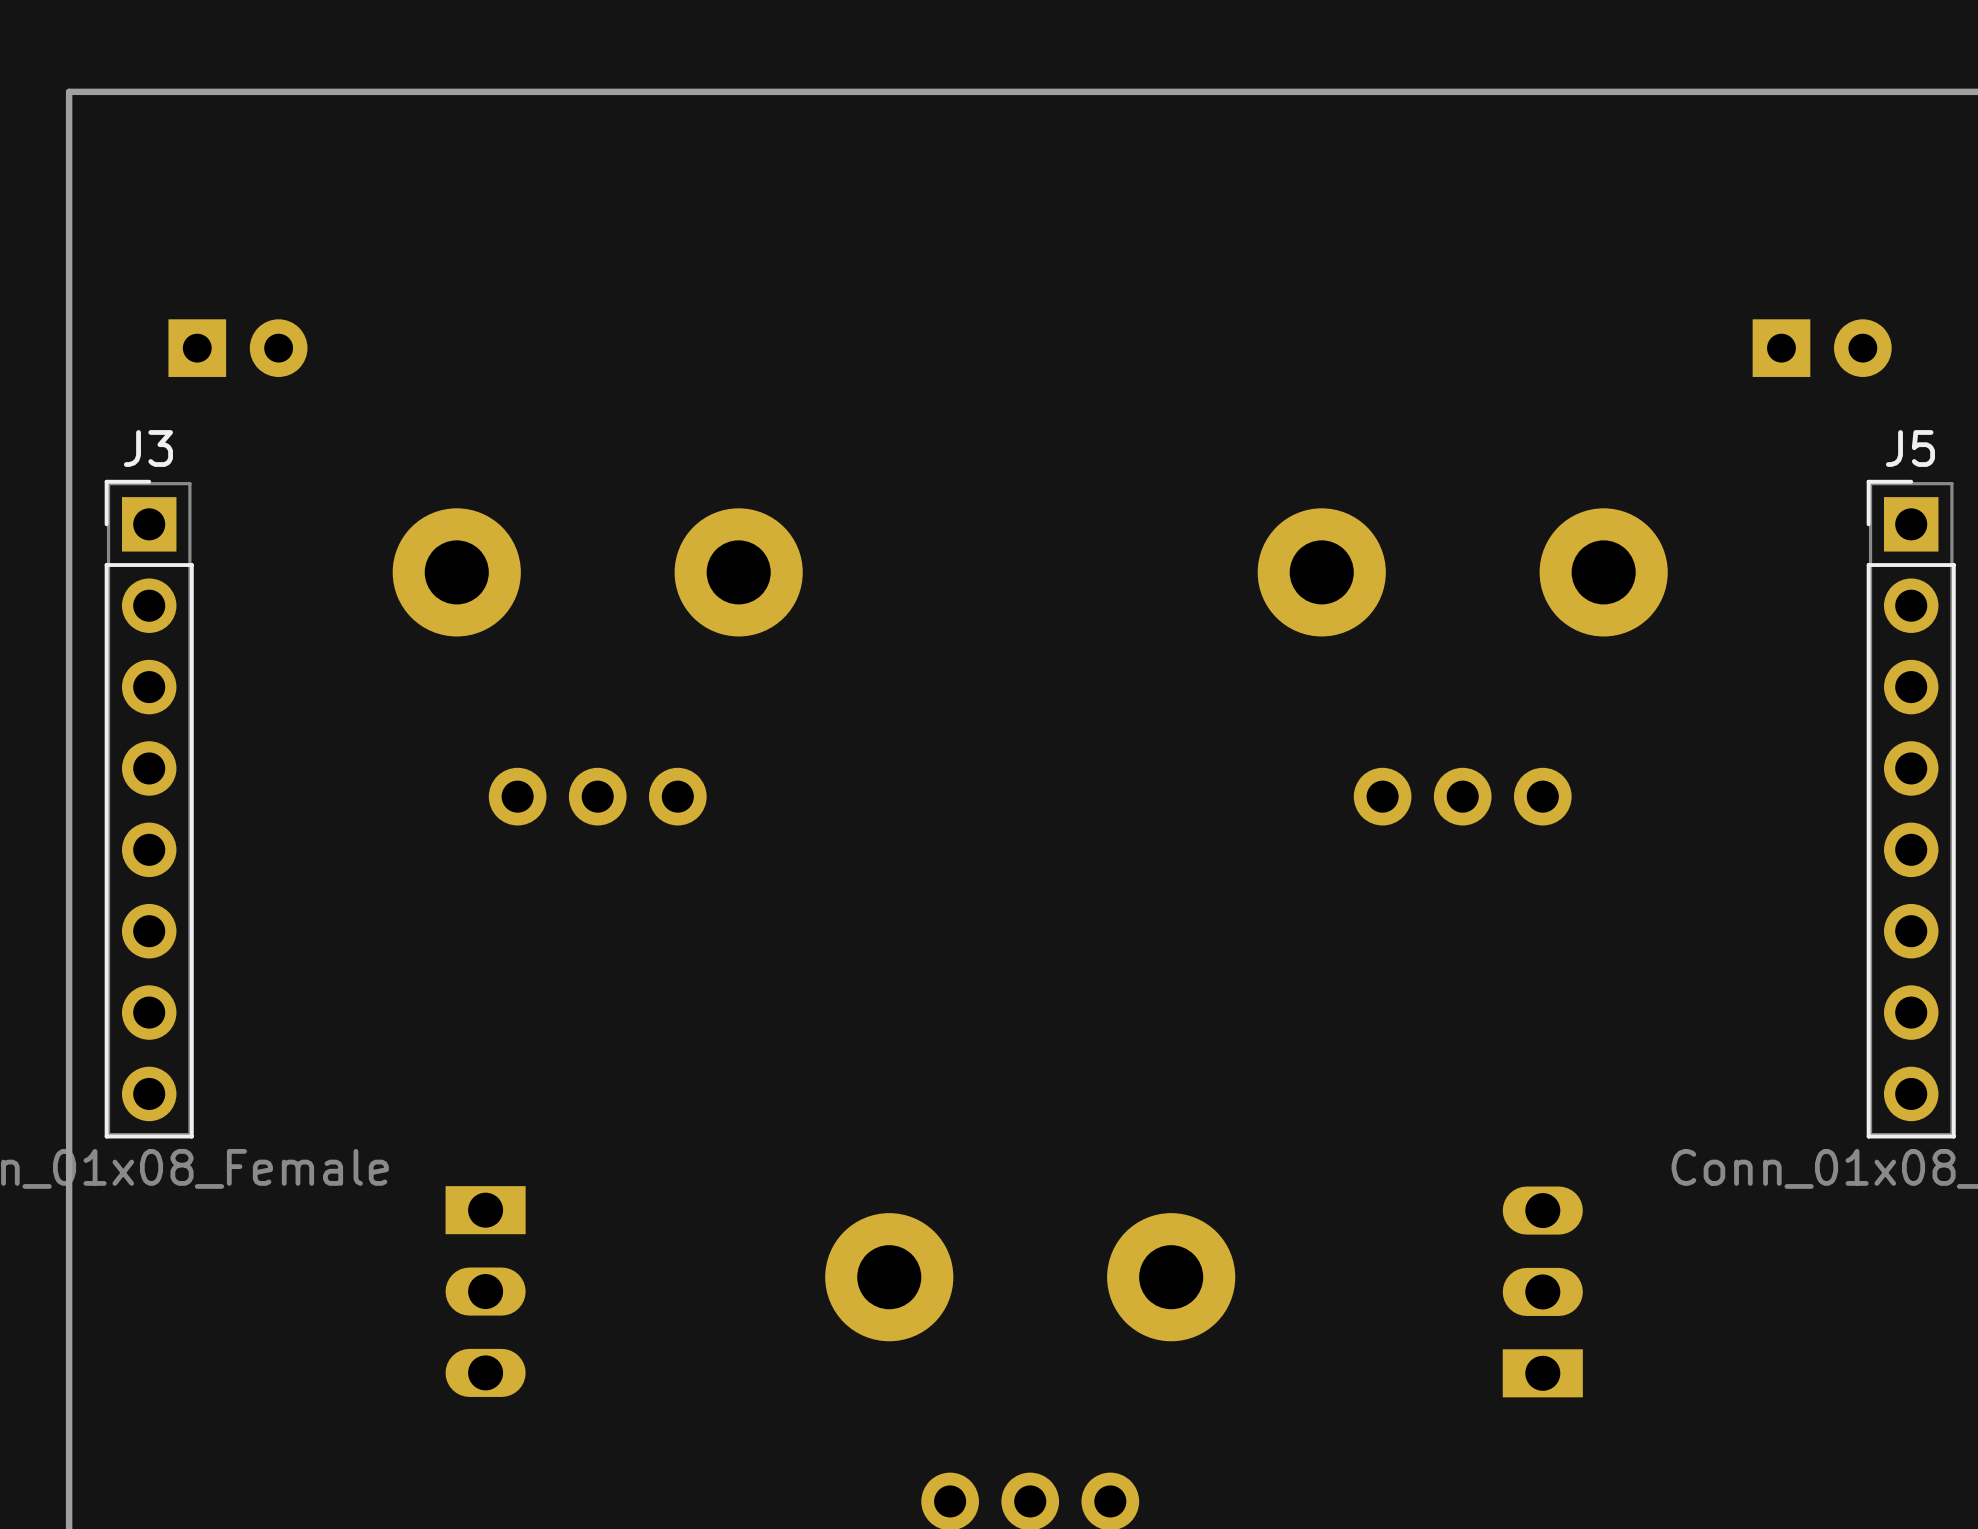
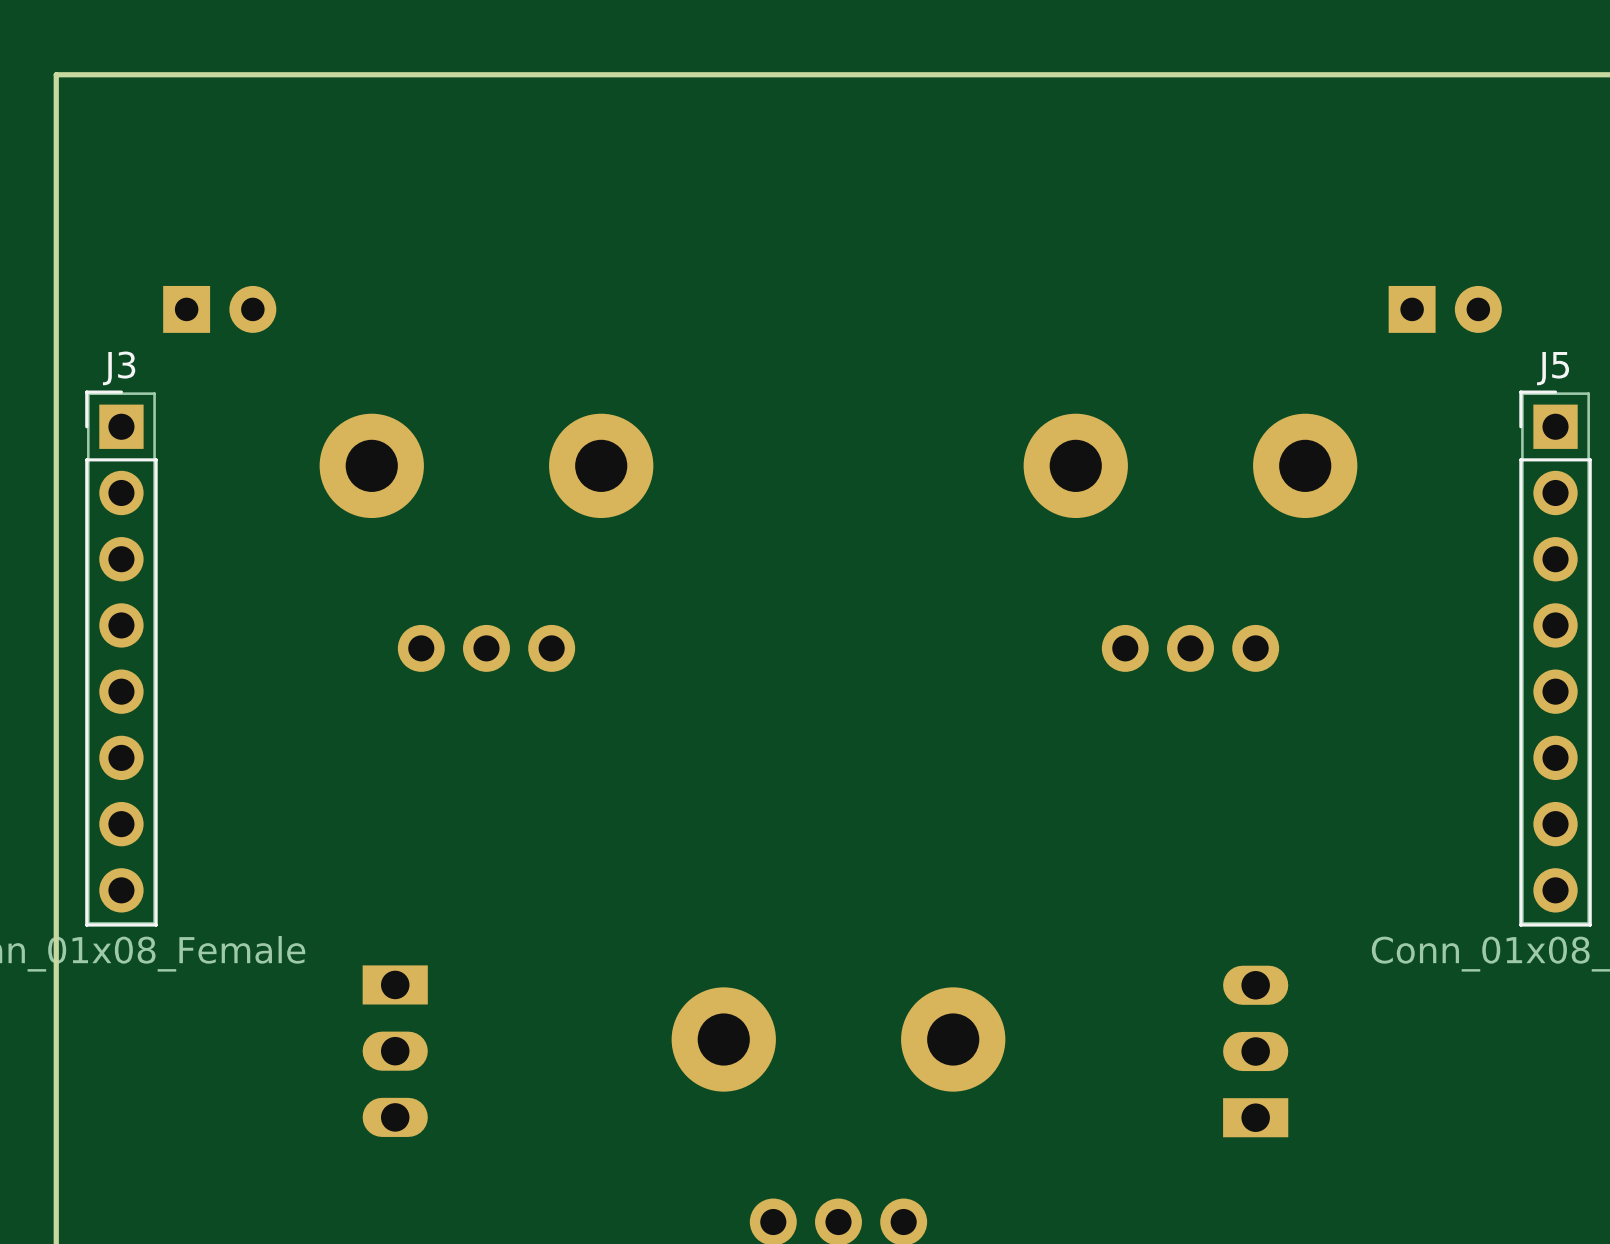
part position: (237, 348) -> (219, 309)
part position: (1822, 348) -> (1445, 309)

